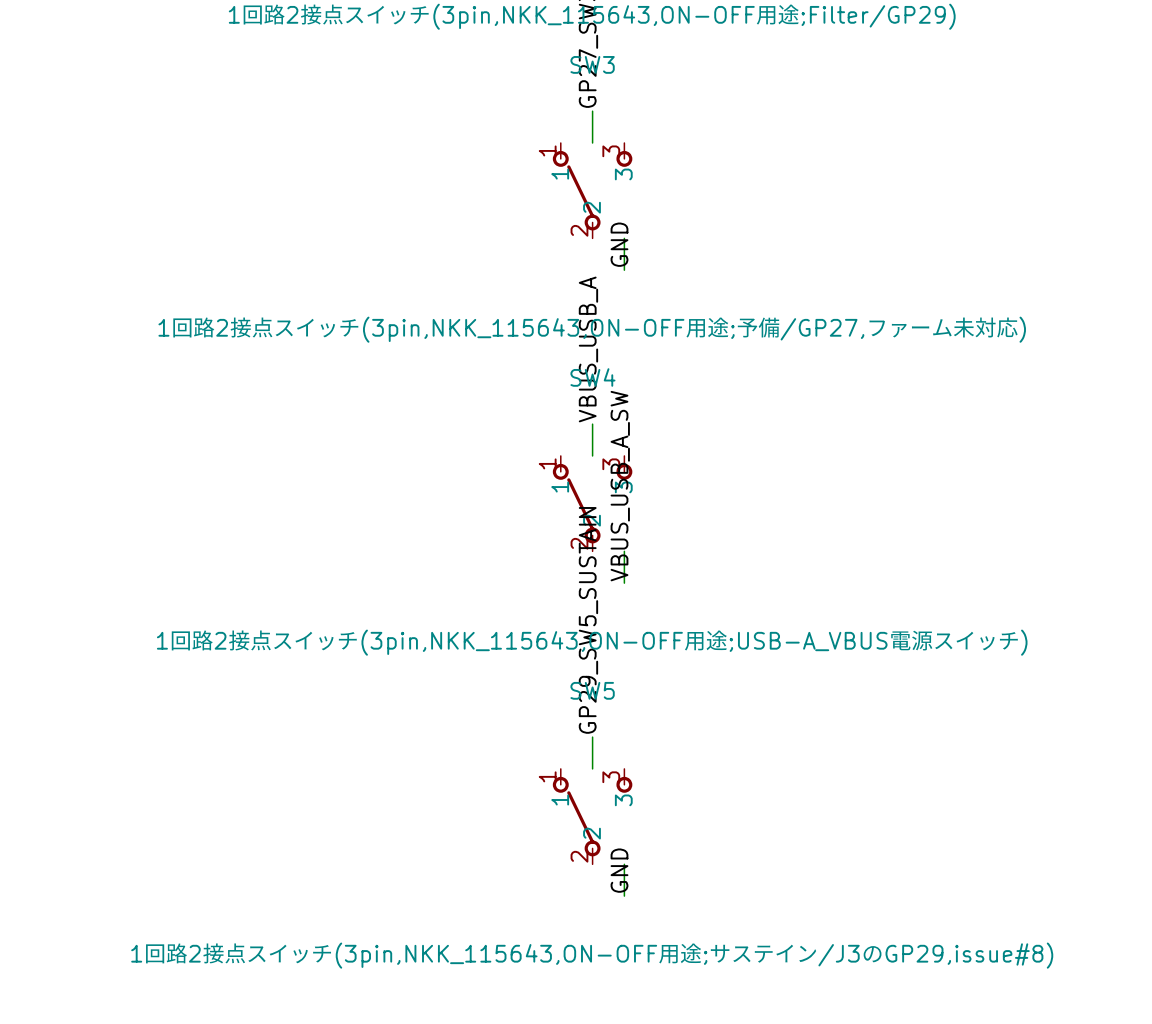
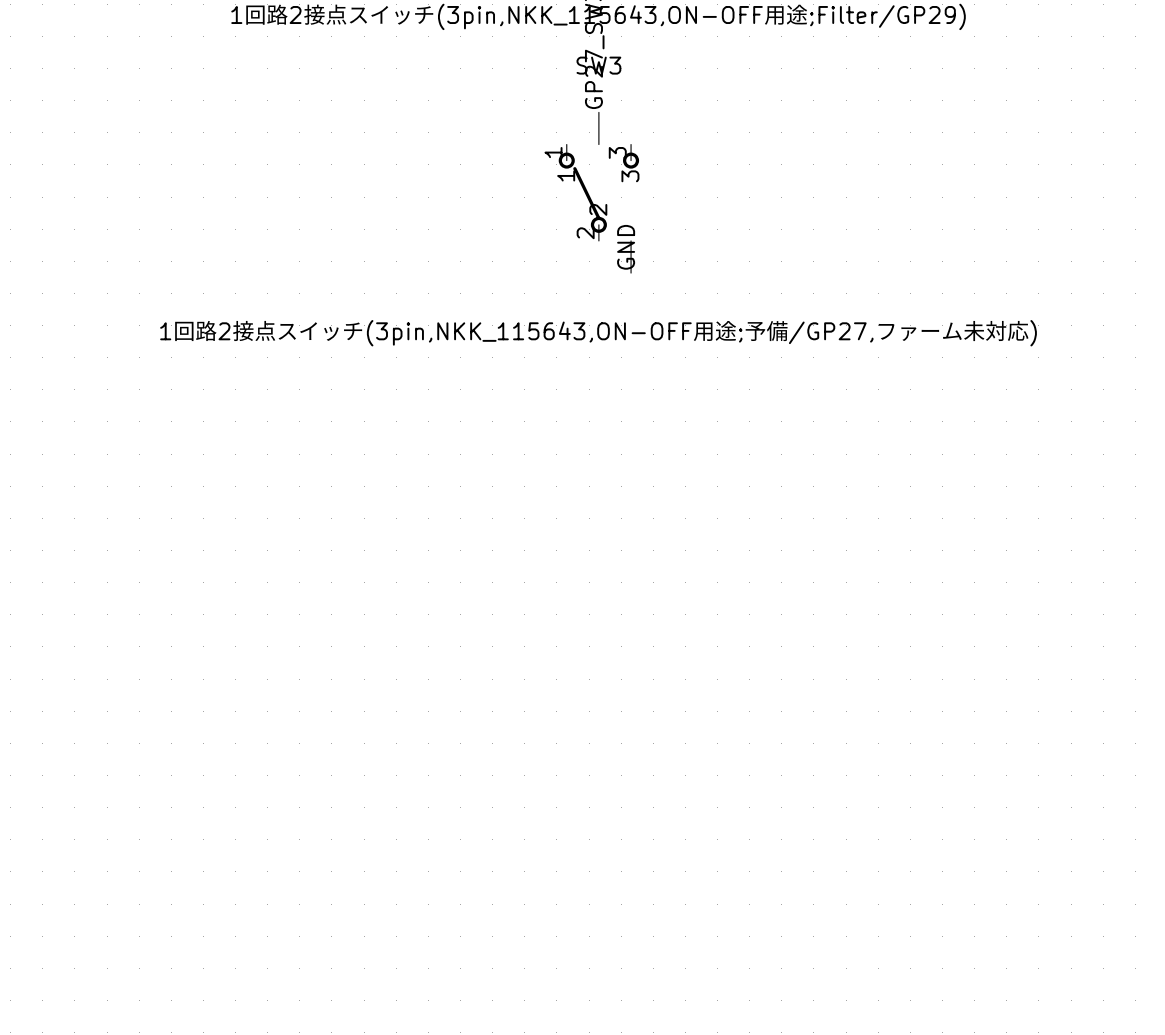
label: VBUS_USB_A (588, 349) -> none
wire: (592, 424) (592, 455) -> none
label: VBUS_USB_A_SW (620, 486) -> none
SW4: 1回路2接点スイッチ(3pin,NKK_115643,ON-OFF用途;USB-A_VBUS電源スイッチ) (592, 503) -> none
wire: (624, 551) (624, 583) -> none
label: GP29_SW5_SUSTAIN (588, 620) -> none
wire: (592, 737) (592, 768) -> none
SW5: 1回路2接点スイッチ(3pin,NKK_115643,ON-OFF用途;サステイン/J3のGP29,issue#8) (592, 816) -> none
wire: (624, 864) (624, 896) -> none
label: GND (619, 870) -> none

